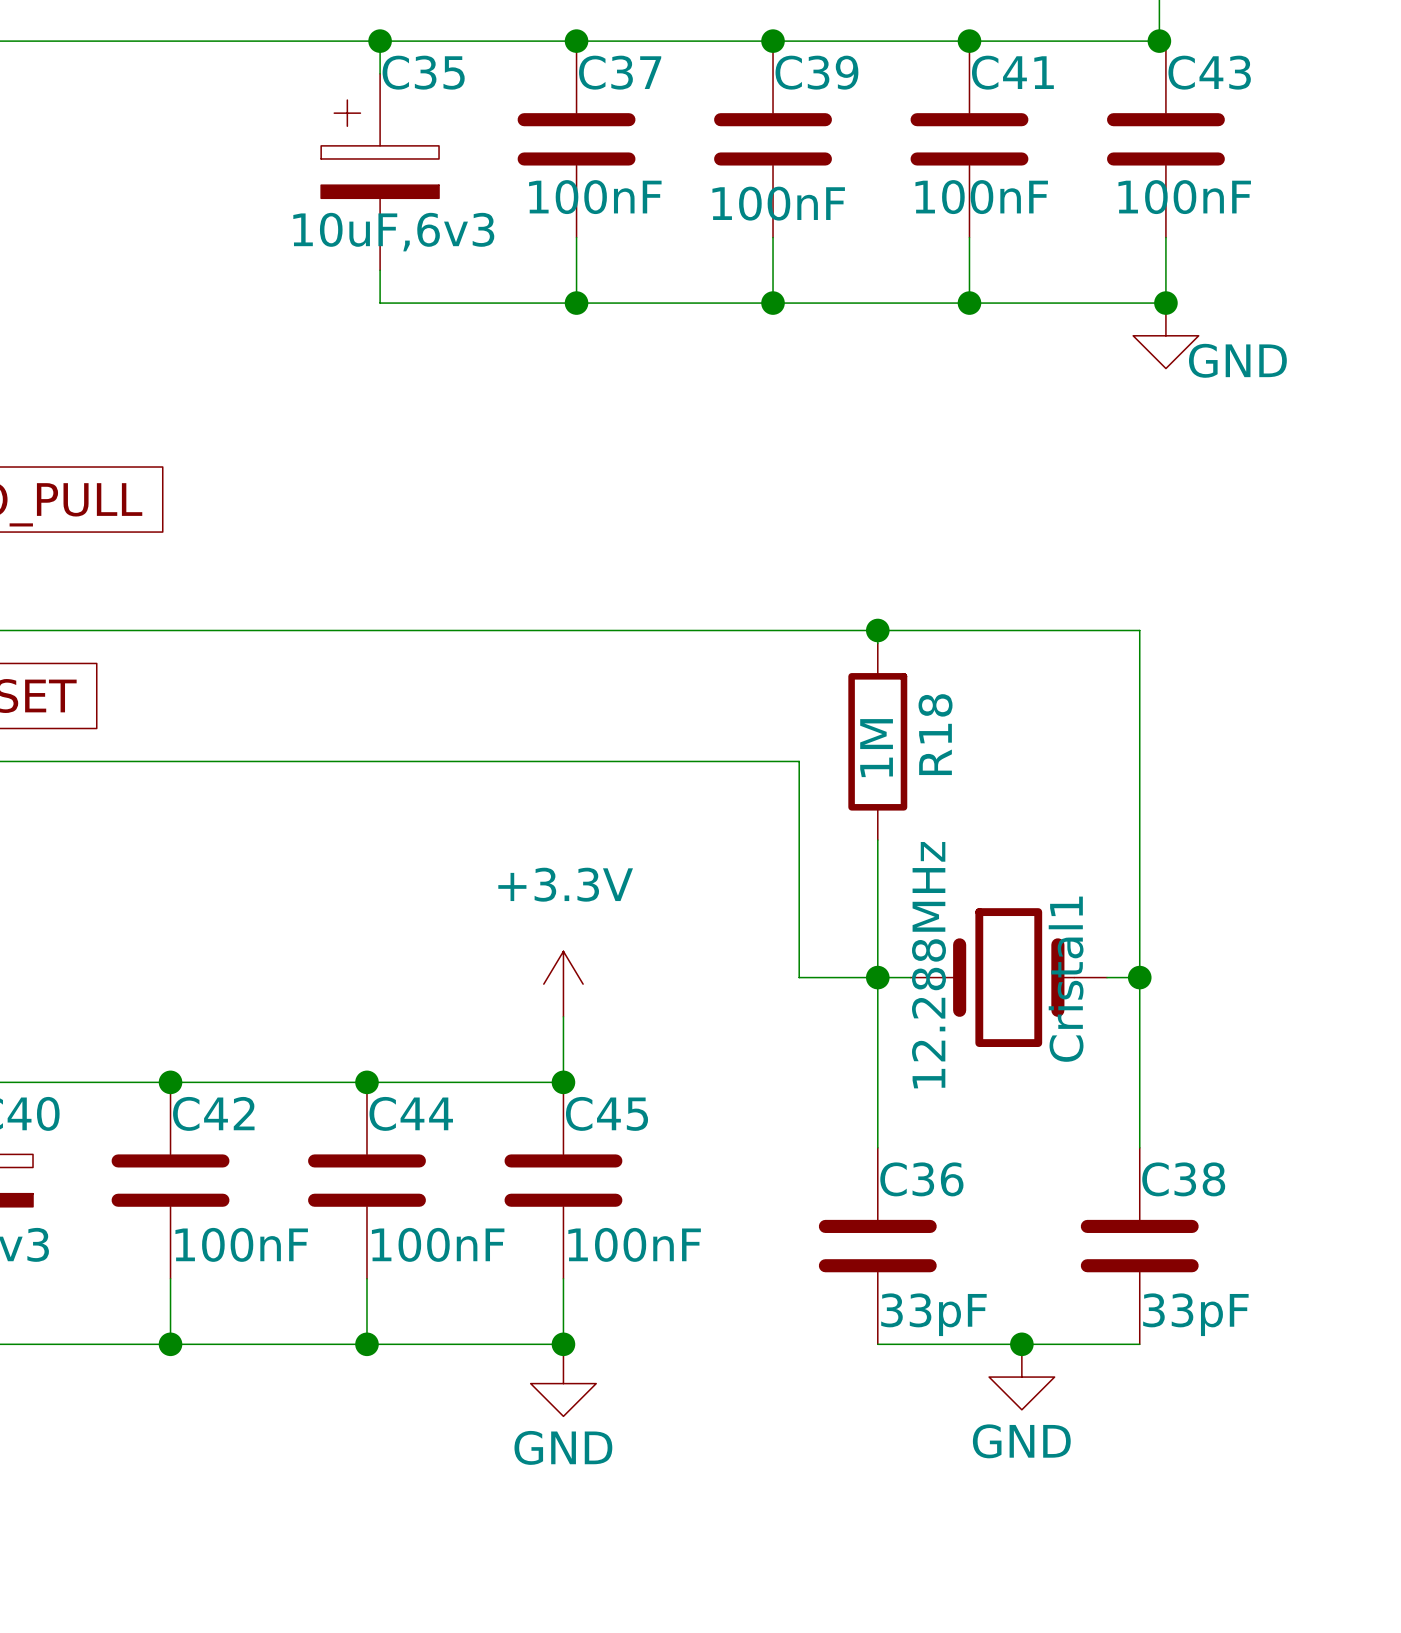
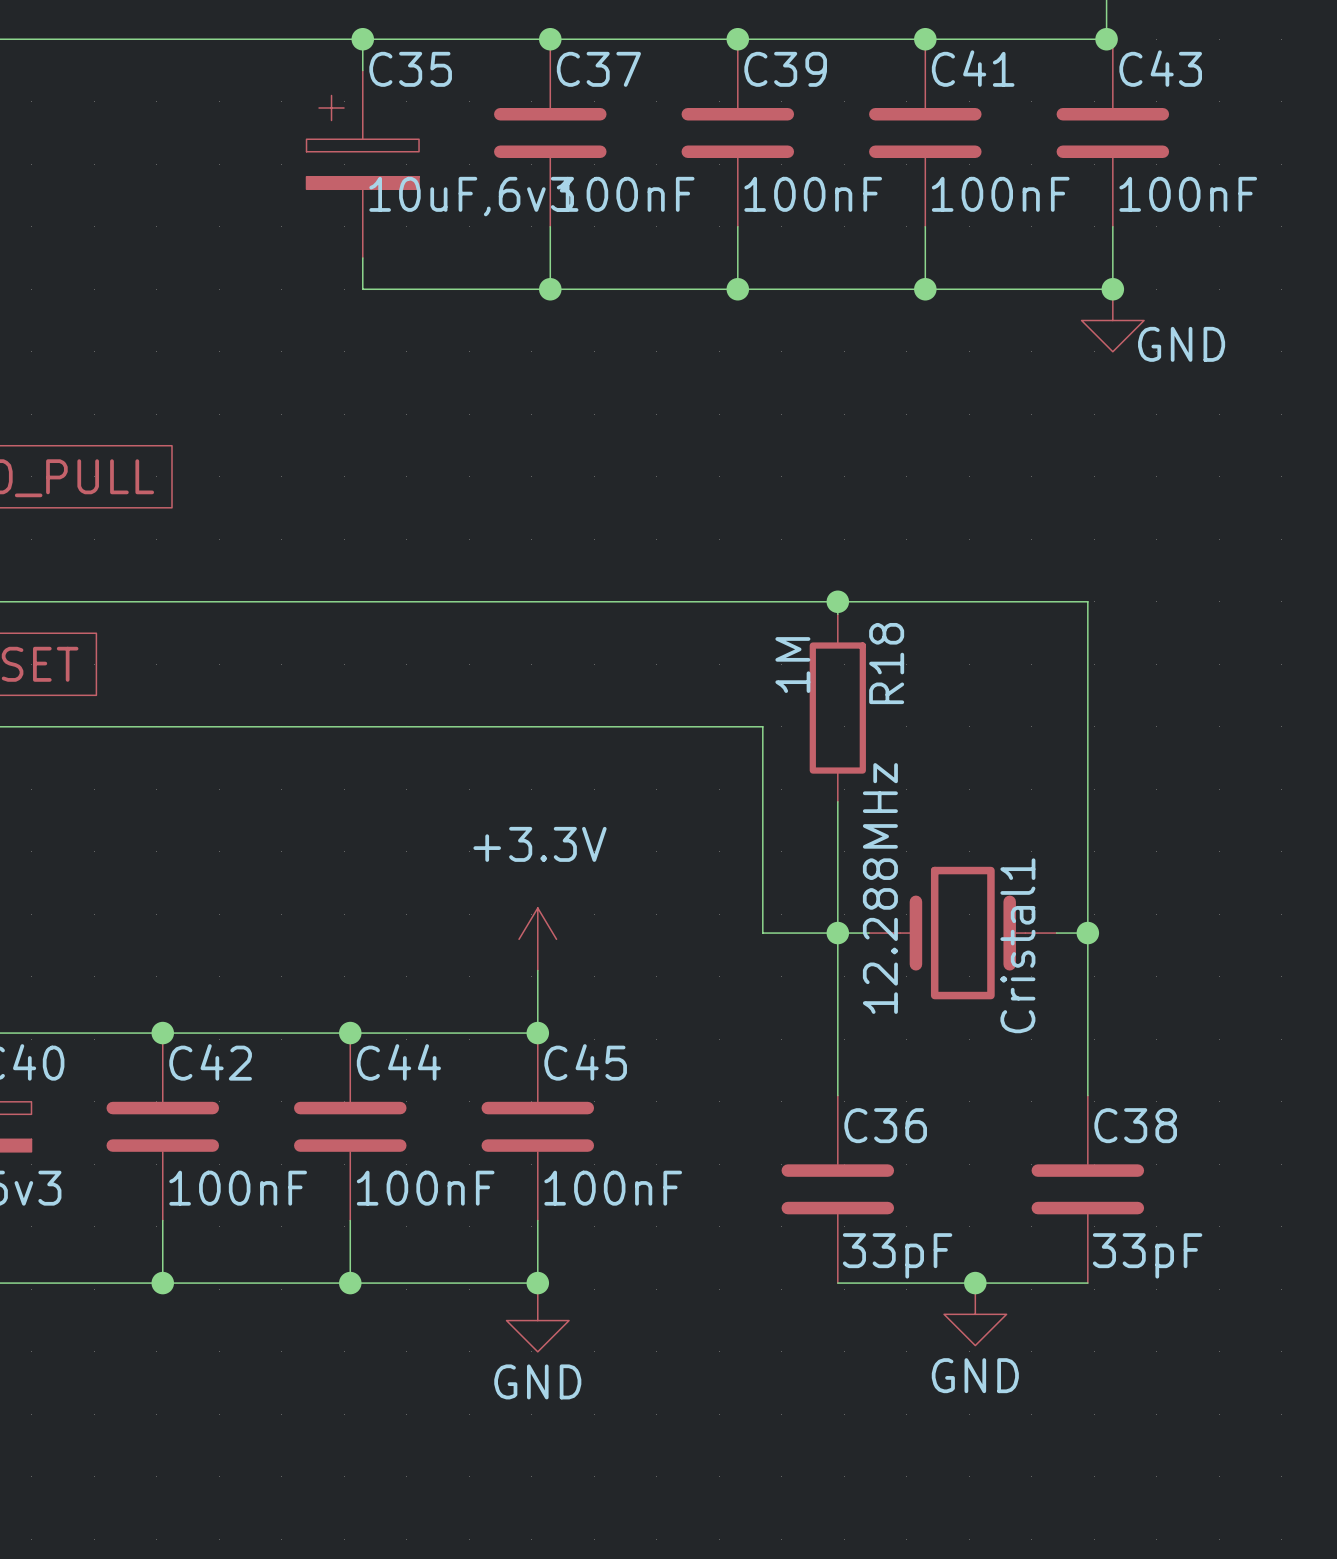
C37 value position: 100nF (595, 197) -> 100nF (625, 194)
C41 value position: 100nF (981, 197) -> 100nF (1000, 194)
C43 value position: 100nF (1184, 197) -> 100nF (1188, 194)
C39 value position: 100nF (778, 203) -> 100nF (813, 194)
C35 value position: 10uF,6v3 (393, 232) -> 10uF,6v3 (471, 196)
R18 name position: R18 (935, 734) -> R18 (886, 663)
R18 value position: 1M (876, 748) -> 1M (792, 665)
Cristal1 value position: 12.288MHz (928, 965) -> 12.288MHz (880, 888)

